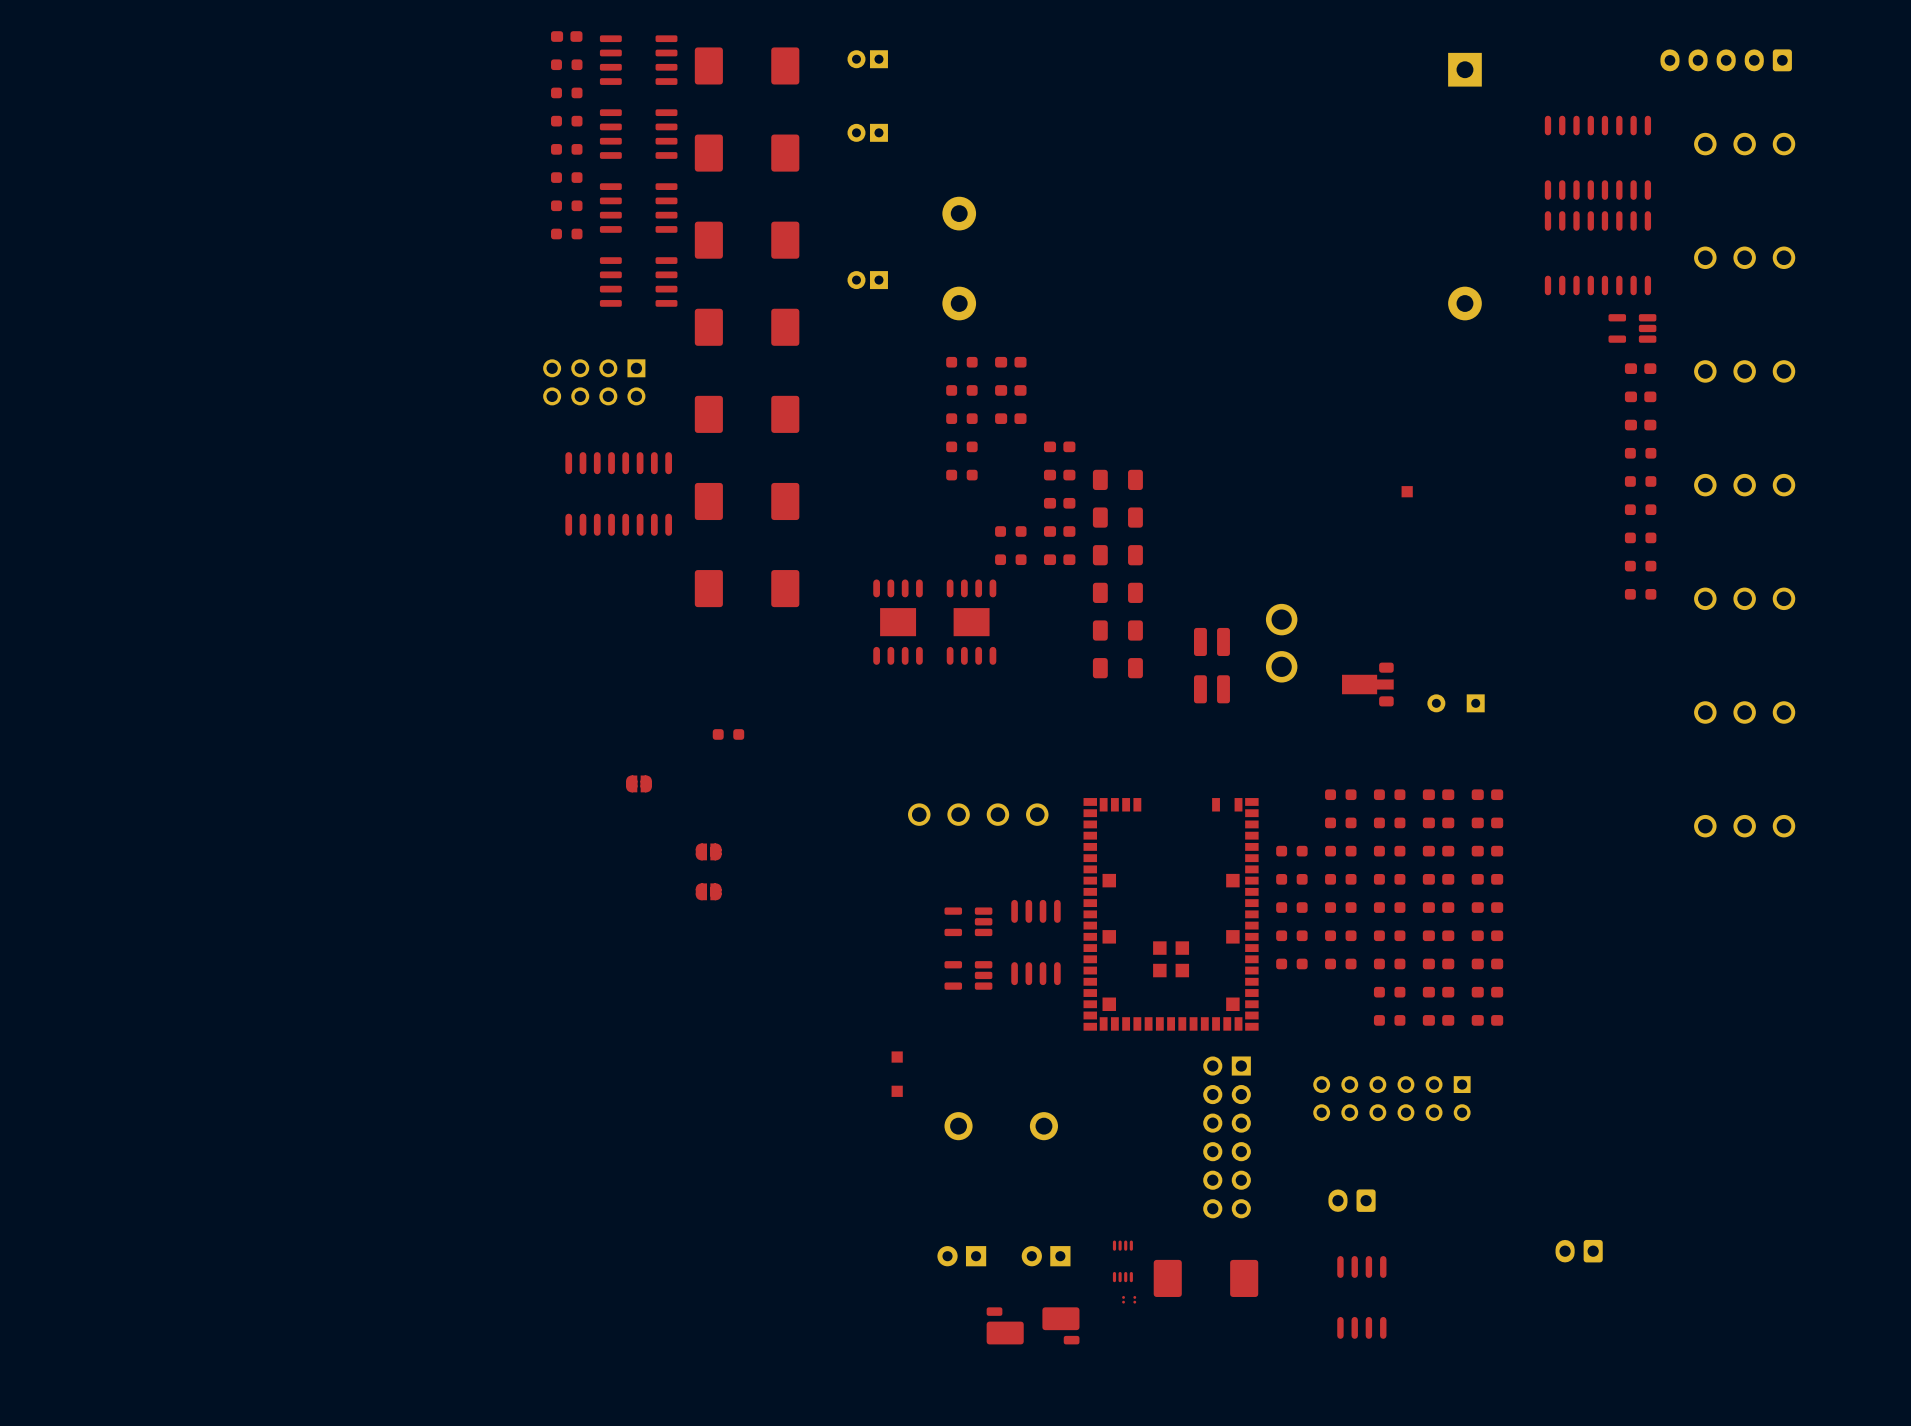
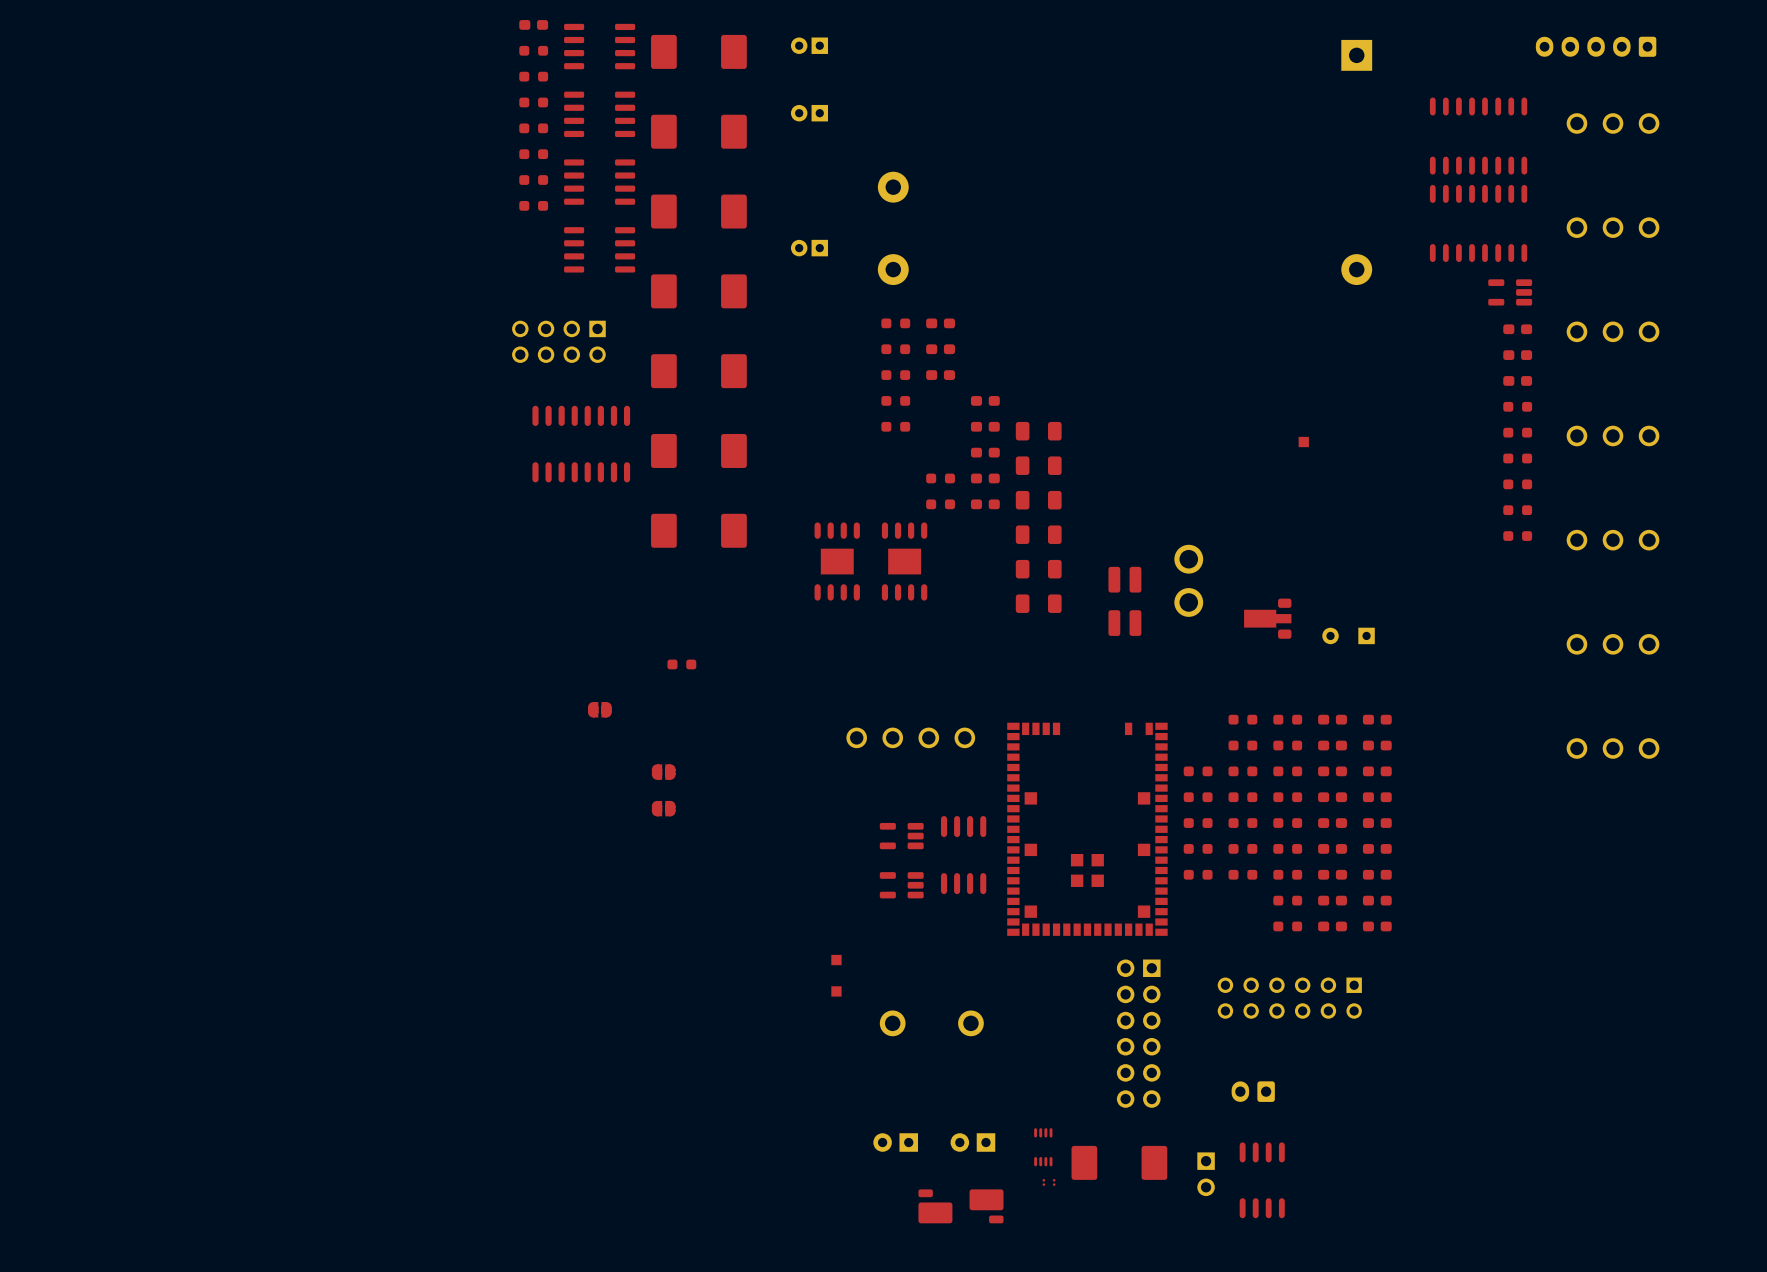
part: (1579, 1251) -> none
part: none -> (1206, 1174)

